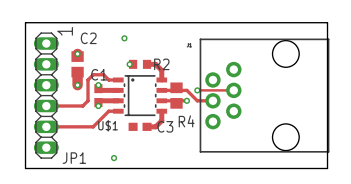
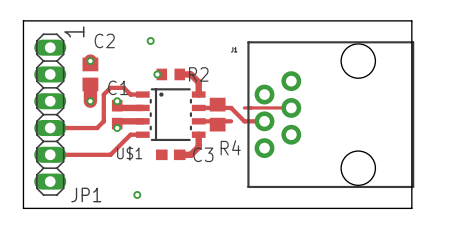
via: (197, 90) -> none
via: (186, 100) -> none

